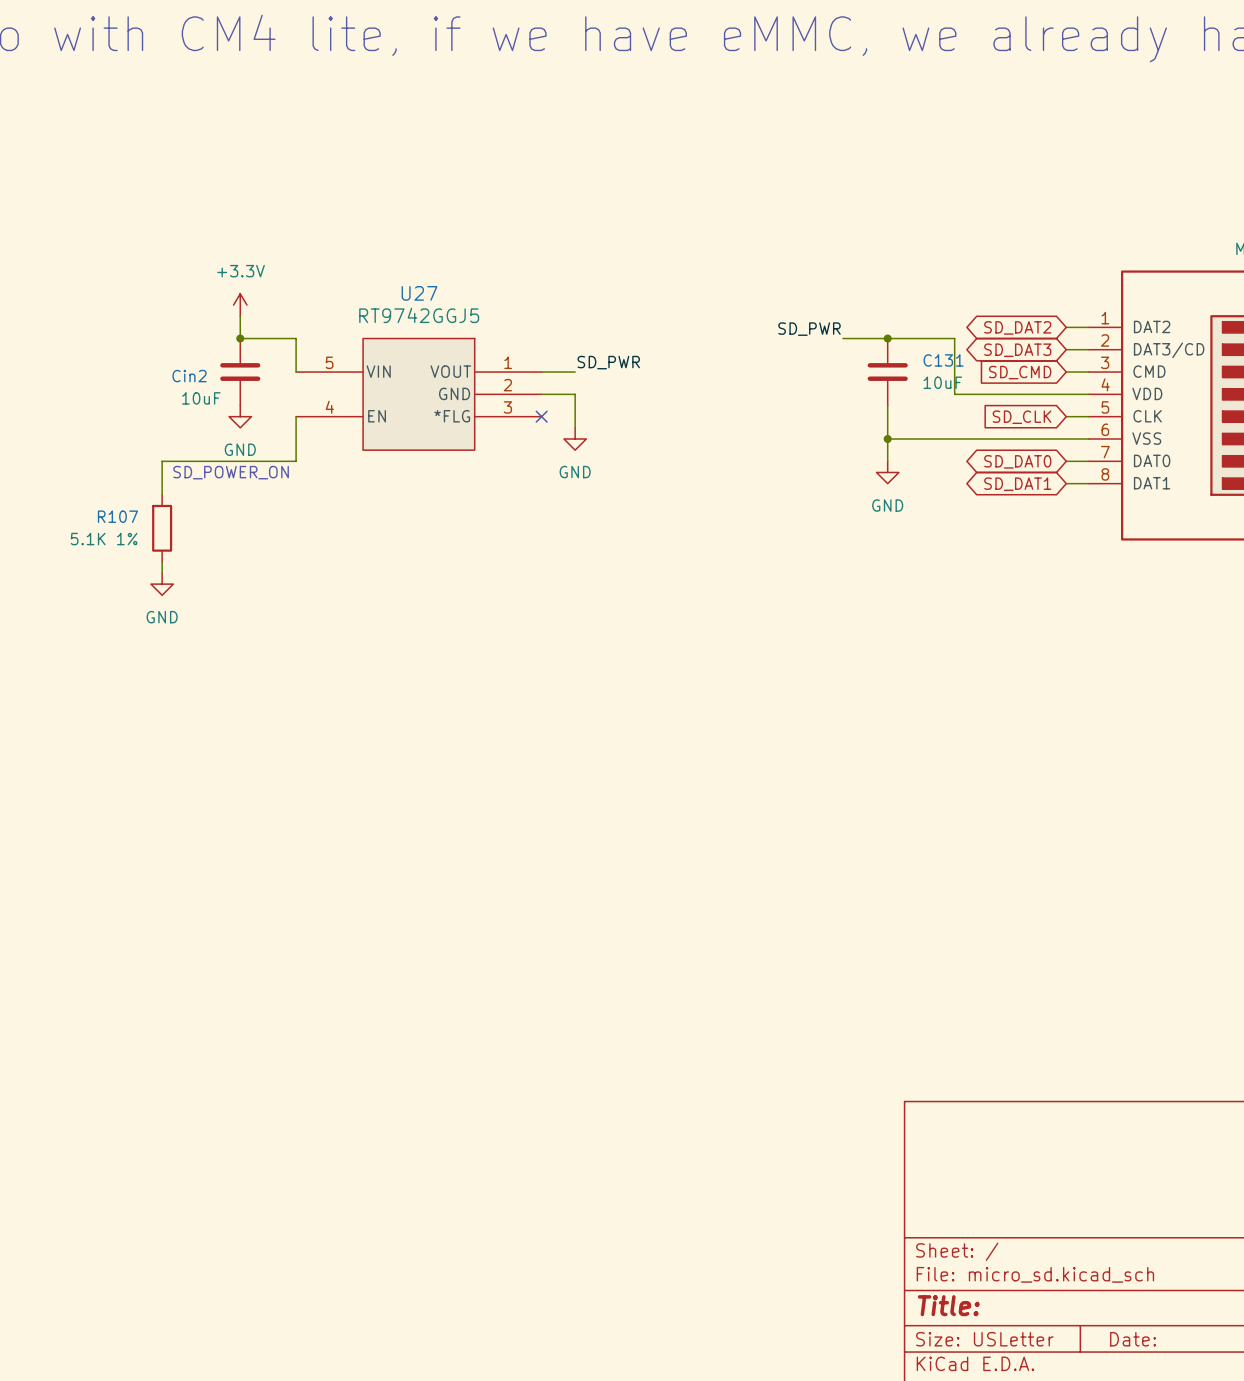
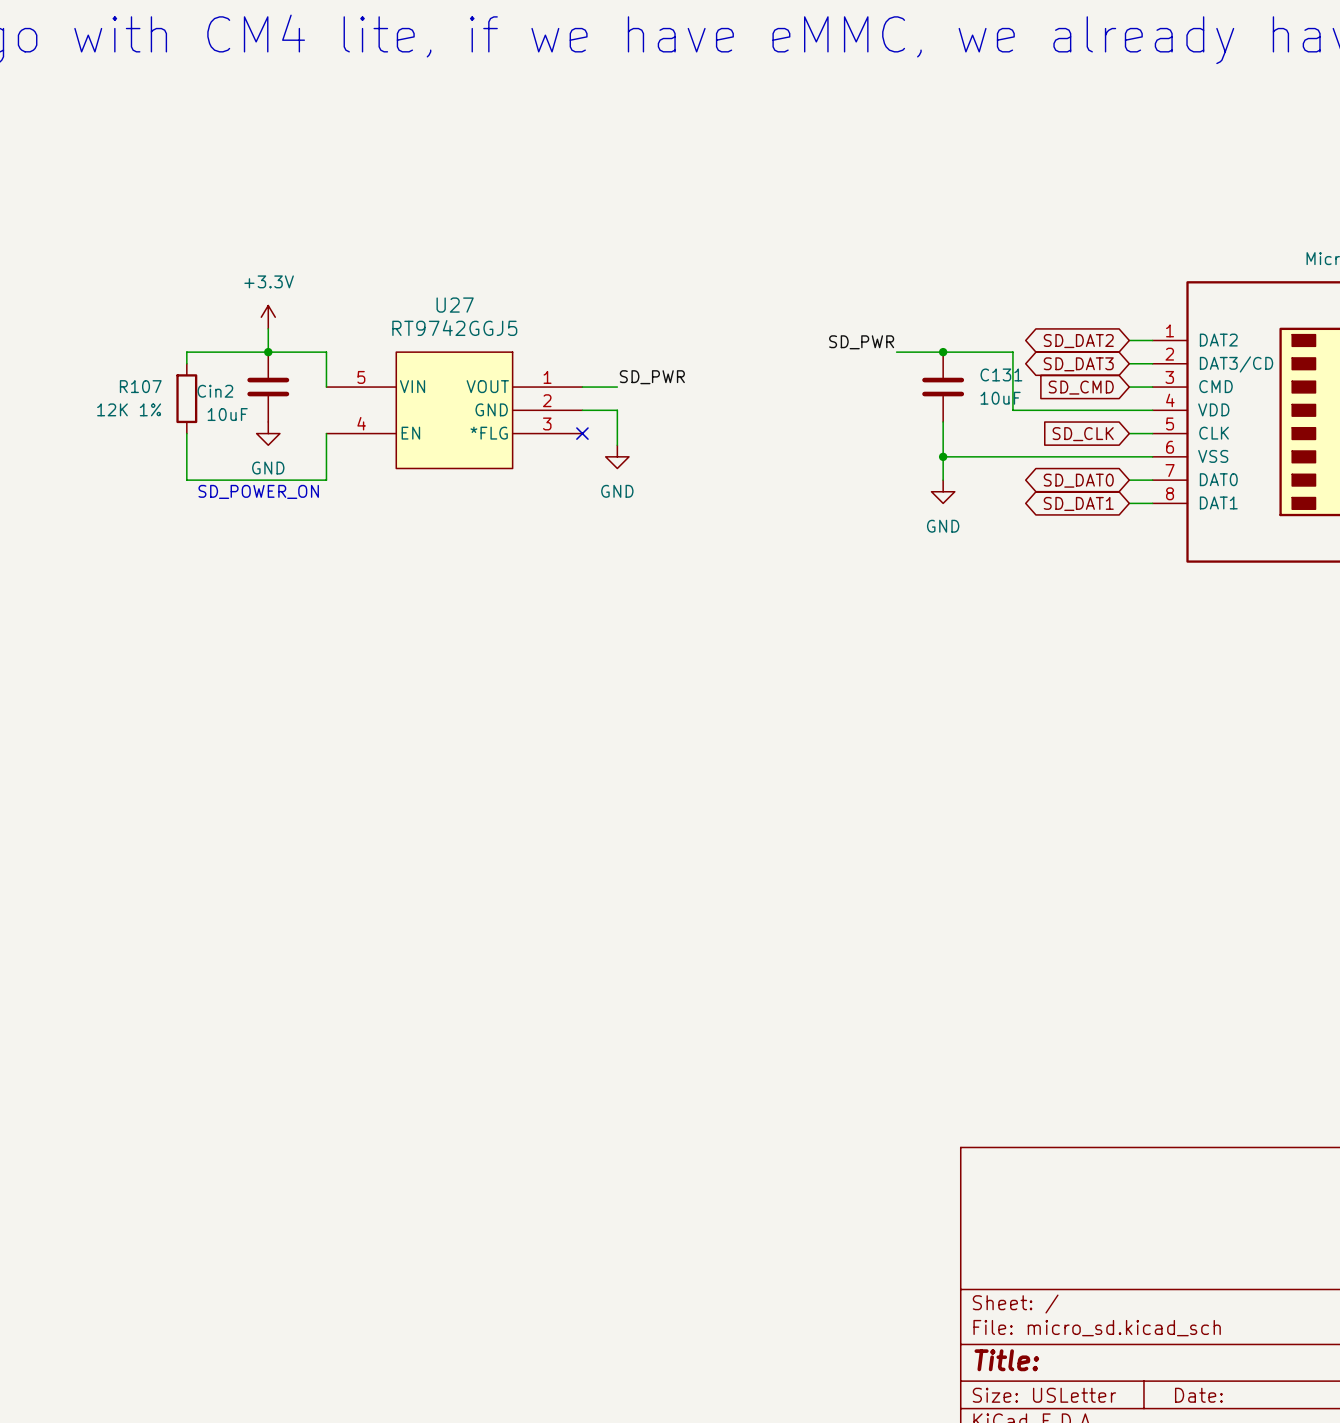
wire: none -> (268, 352) (186, 352) (186, 363)
wire: (162, 461) (162, 494) -> (186, 480) (186, 433)
R107 position: (162, 528) -> (186, 398)
R107 value: 5.1K 1% (104, 539) -> 12K 1% (129, 409)
wire: (162, 561) (162, 572) -> none
power symbol: GND (162, 584) -> none

